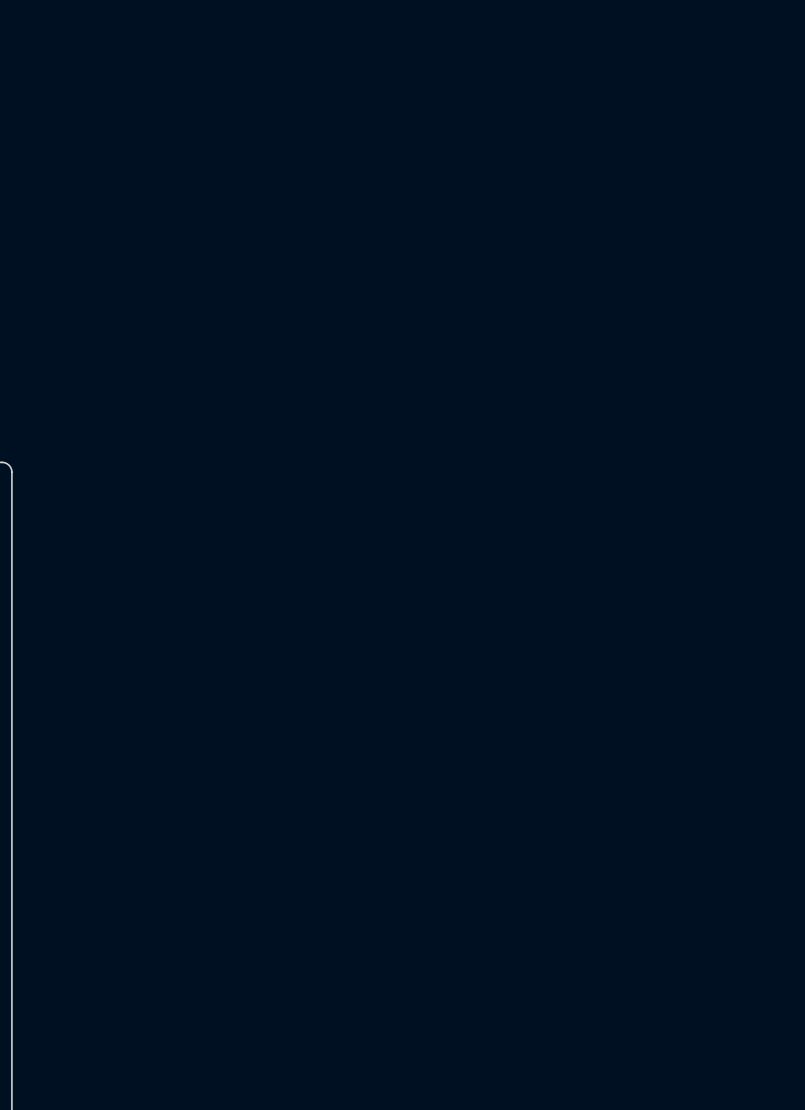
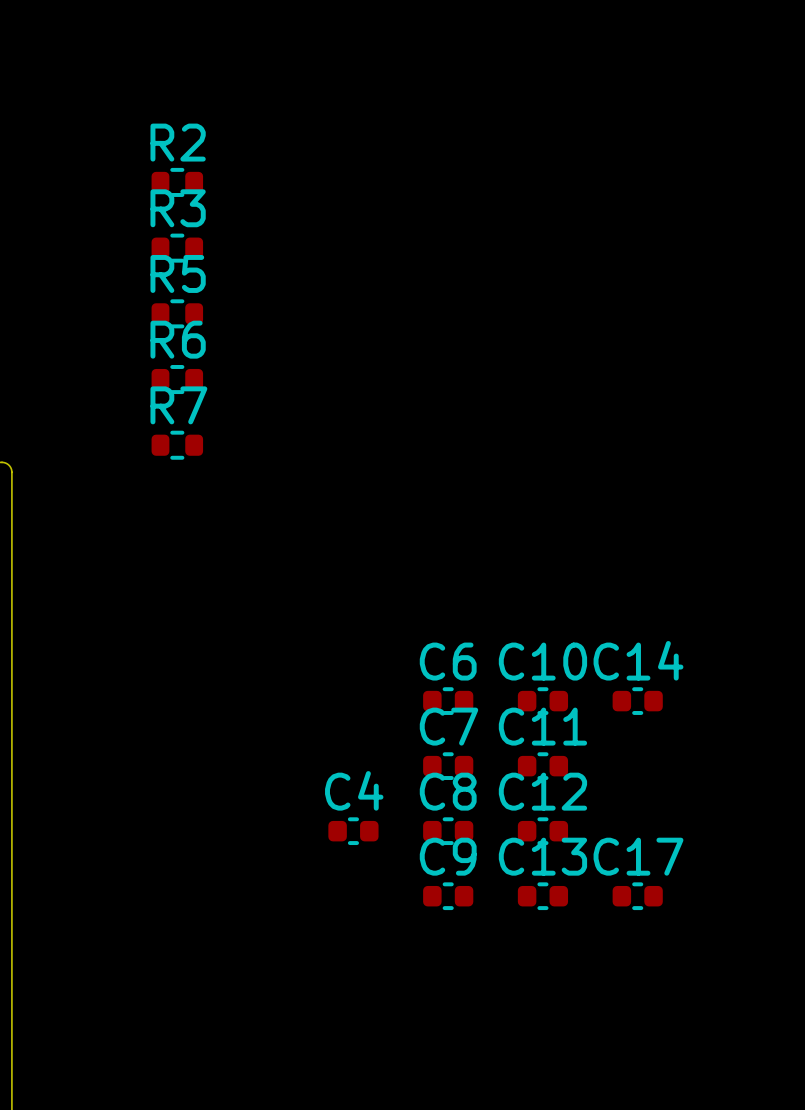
R2: none -> (177, 182)
R3: none -> (177, 248)
R5: none -> (177, 313)
R6: none -> (177, 379)
R7: none -> (177, 445)
C6: none -> (448, 701)
C10: none -> (542, 701)
C14: none -> (637, 701)
C7: none -> (448, 766)
C11: none -> (542, 766)
C4: none -> (353, 831)
C8: none -> (448, 831)
C12: none -> (542, 831)
C9: none -> (448, 896)
C13: none -> (542, 896)
C17: none -> (637, 896)

